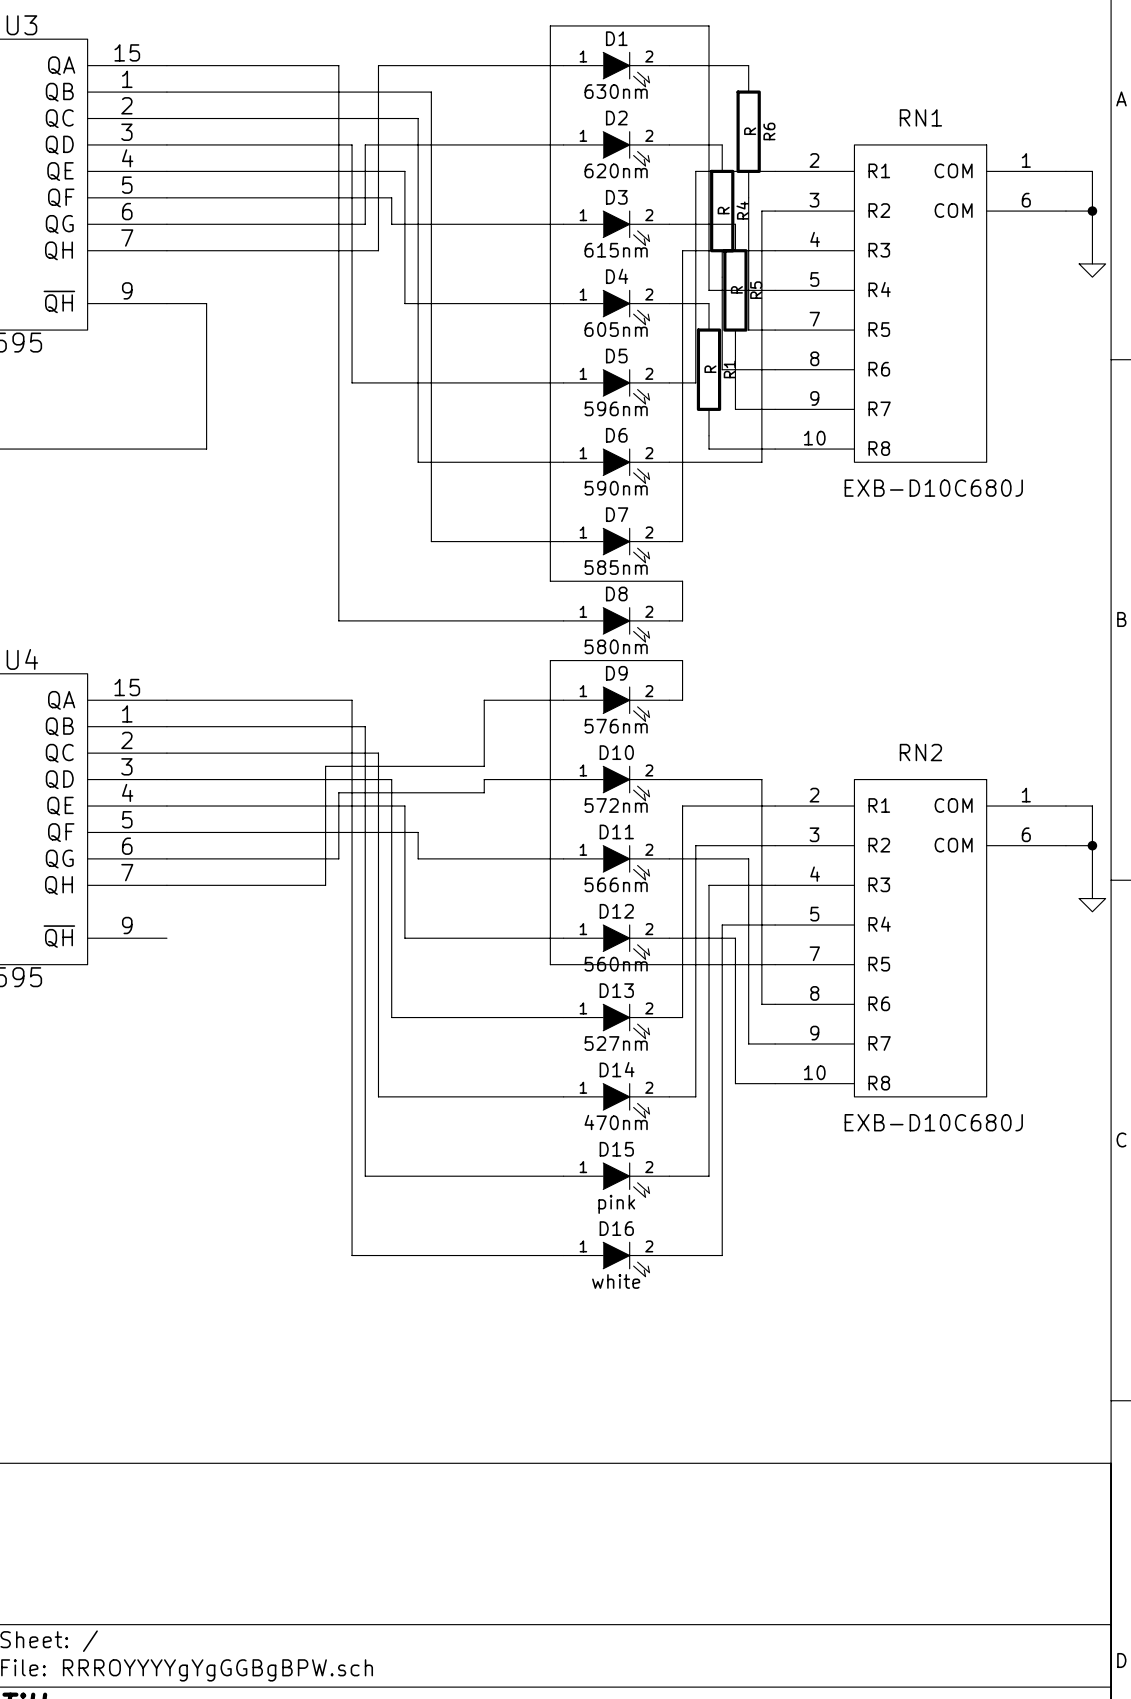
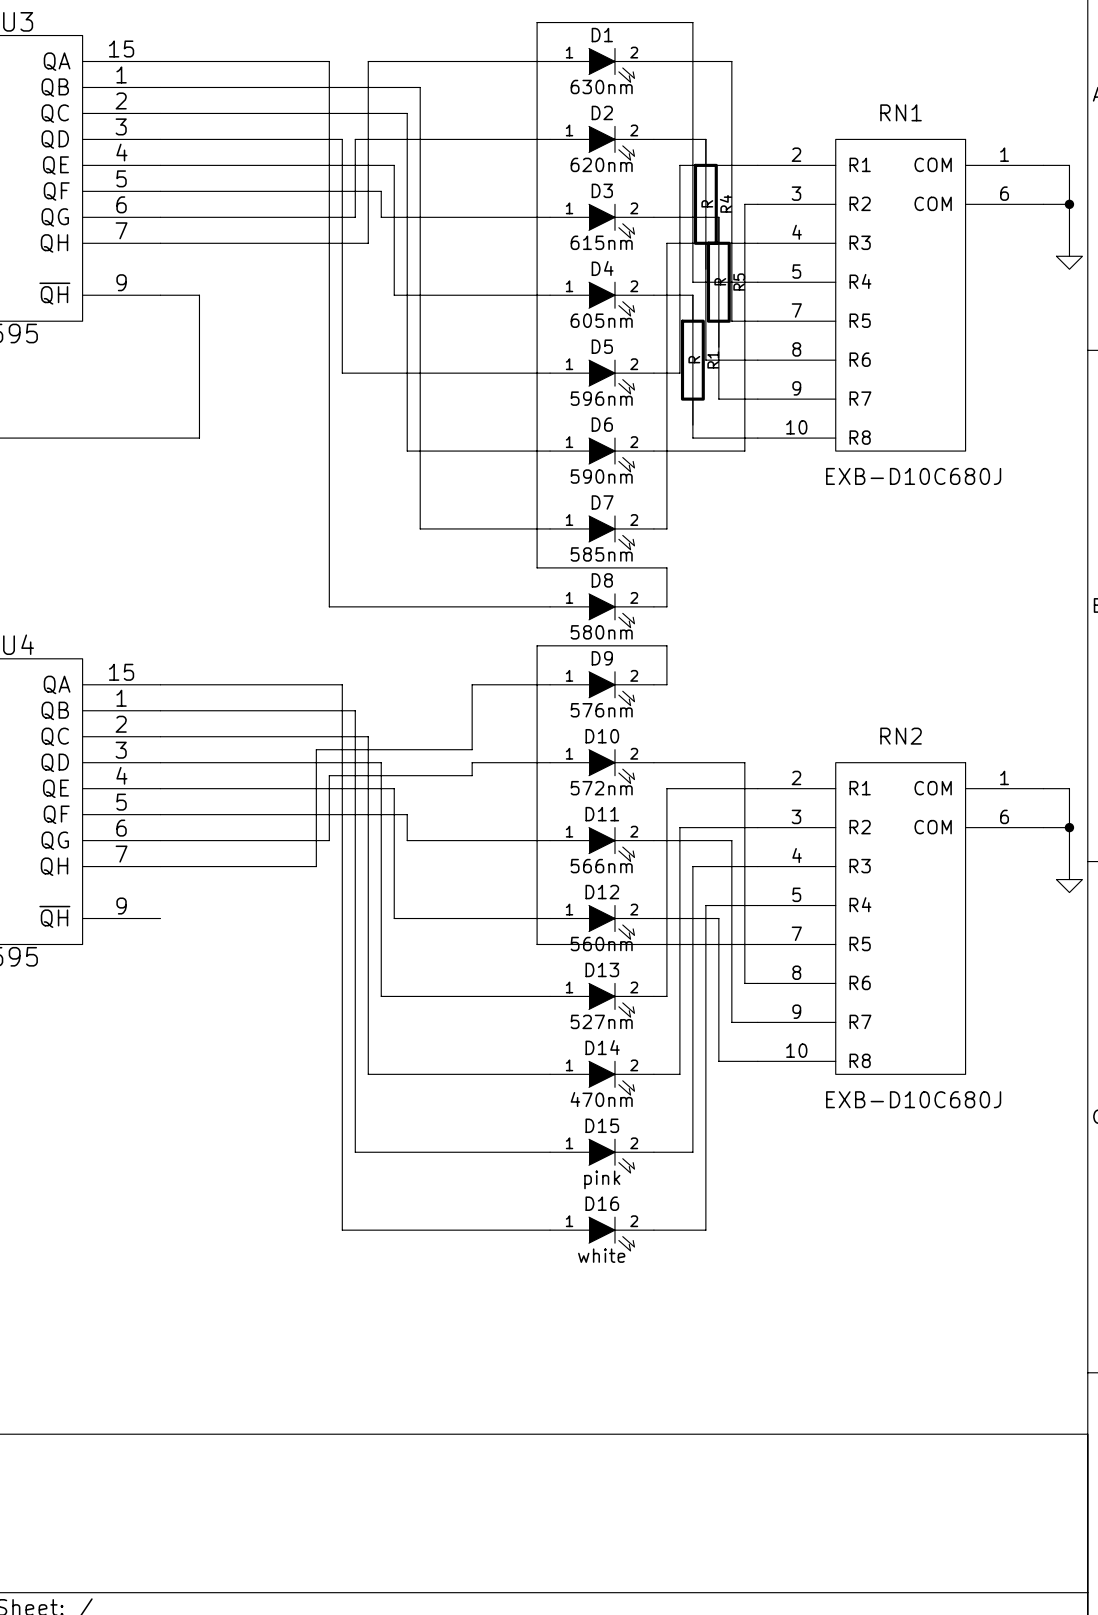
wire: none -> (731, 61) (731, 191)
R6: R (748, 131) -> none
wire: none -> (705, 139) (705, 269)
wire: none -> (718, 217) (718, 347)
wire: none -> (692, 295) (692, 425)

